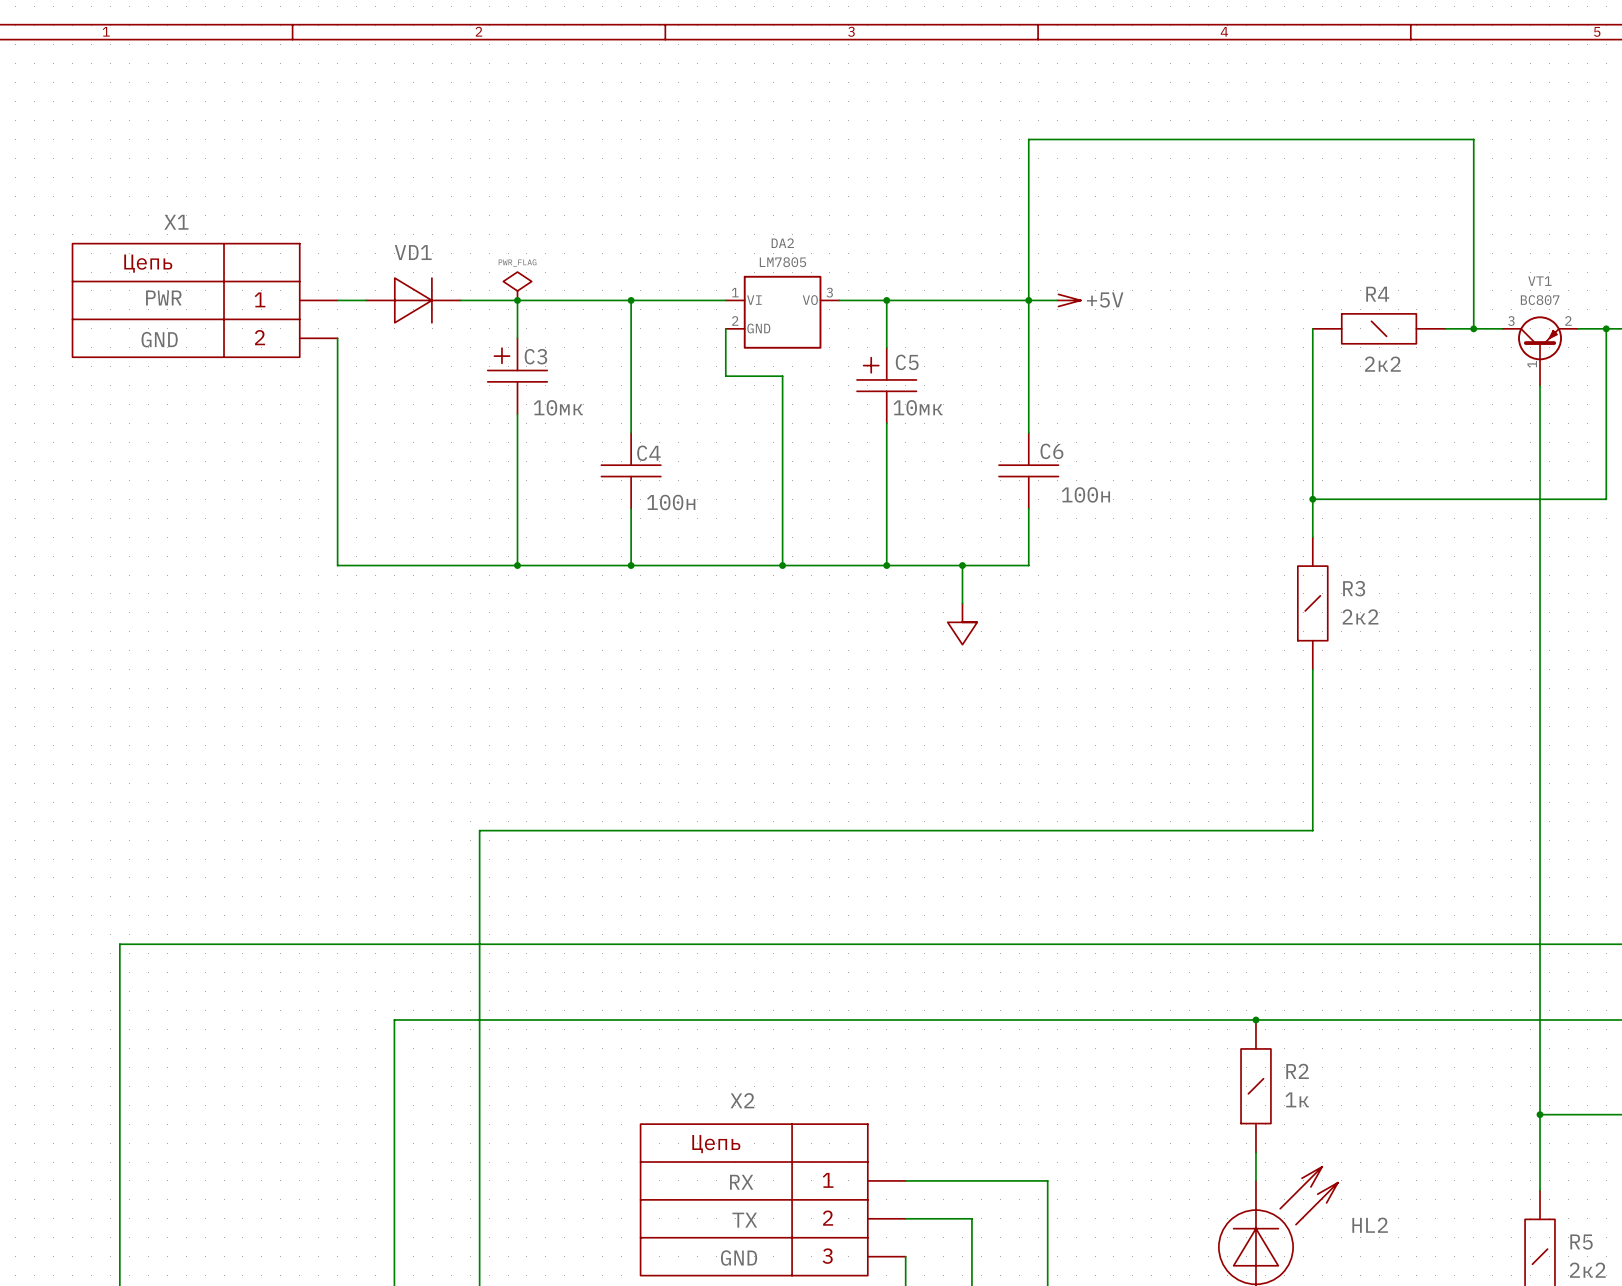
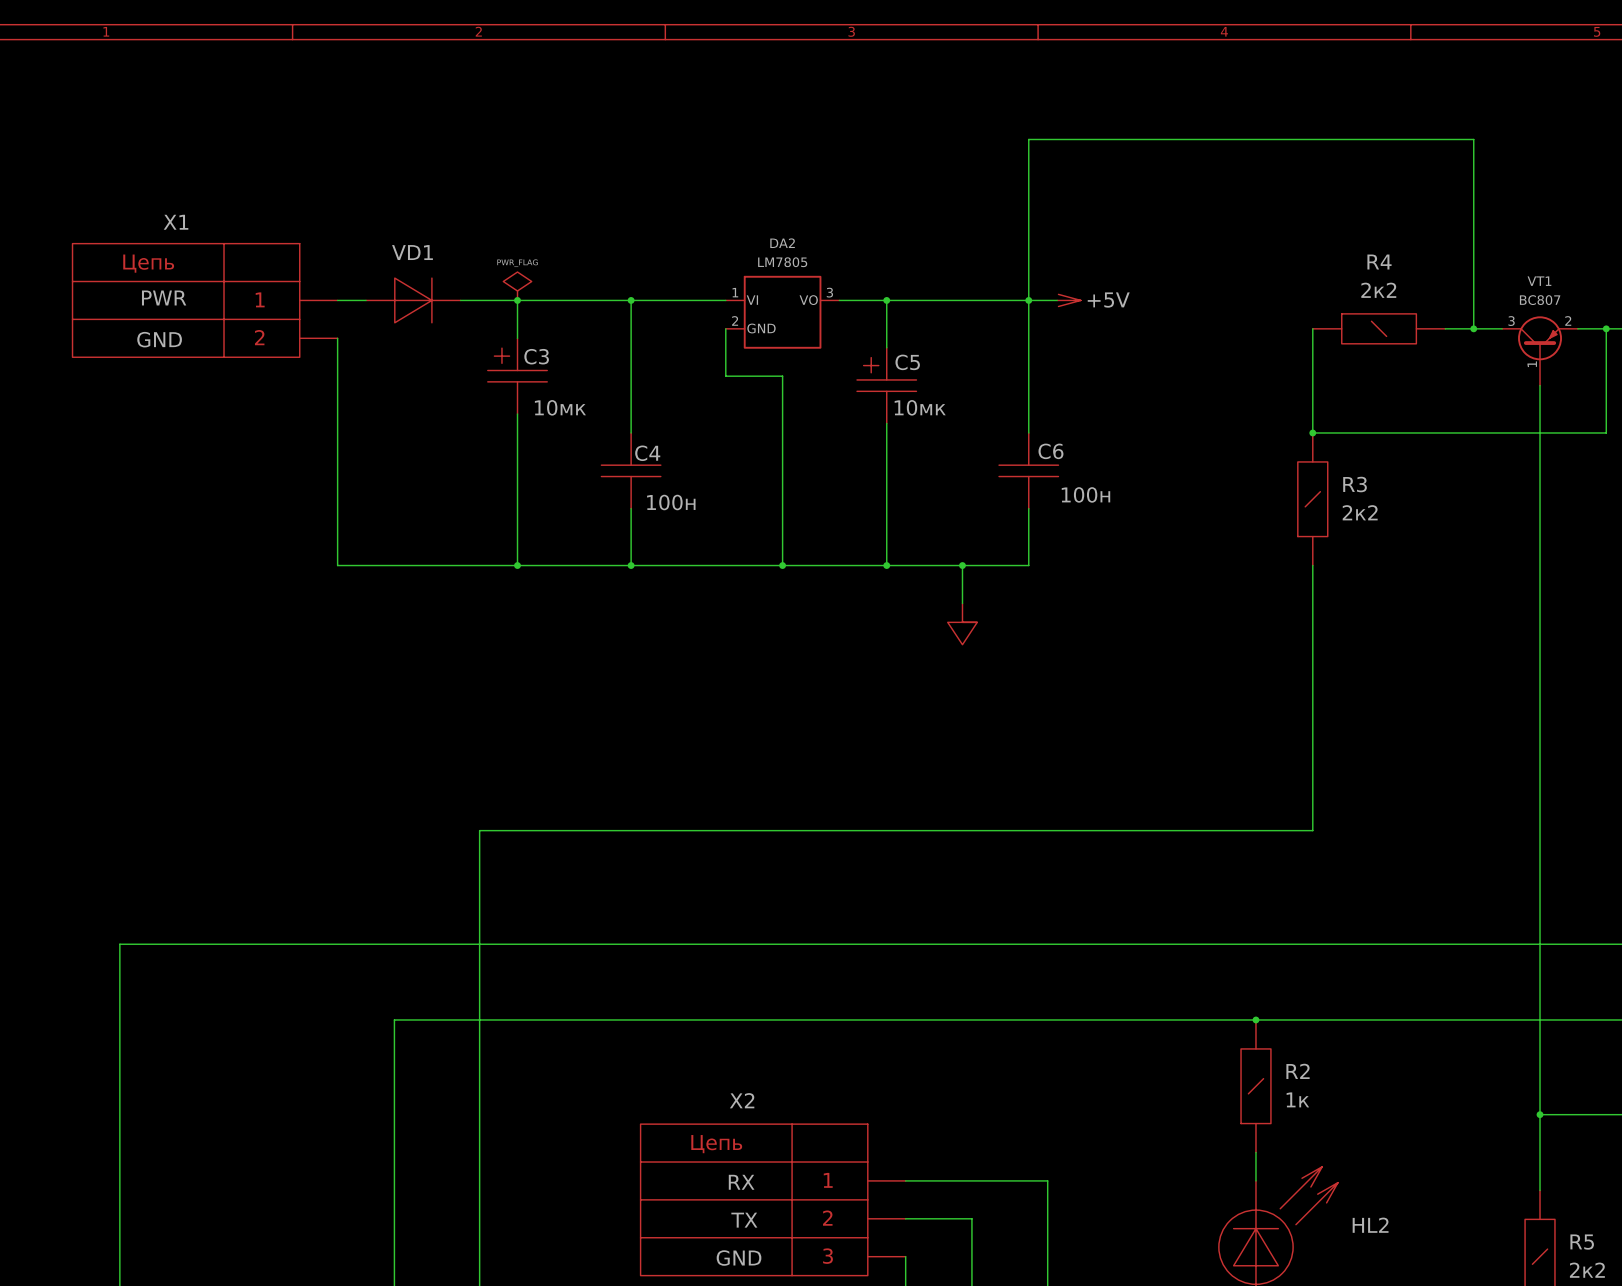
R4 name position: R4 (1377, 294) -> R4 (1379, 262)
R4 value position: 2к2 (1382, 364) -> 2к2 (1378, 290)
wire: (1312, 432) (1312, 537) -> (1312, 565) (1312, 669)
junction: none -> (1312, 432)
wire: (1606, 432) (1606, 499) (1312, 499) -> (1606, 432) (1312, 432)
junction: (1312, 499) -> none
R3 position: (1312, 603) -> (1312, 499)

